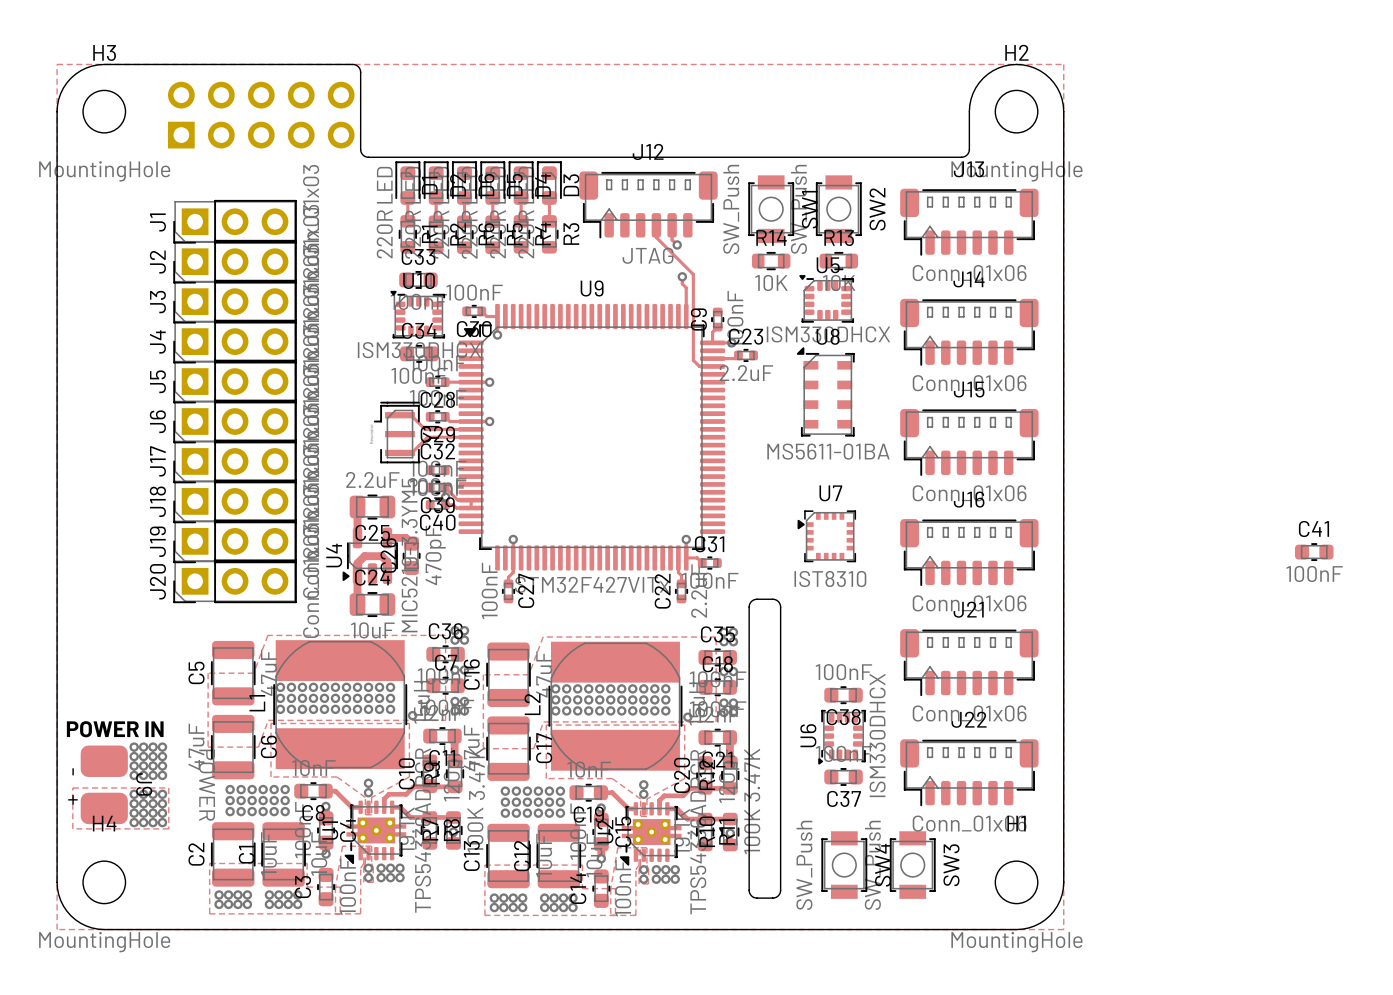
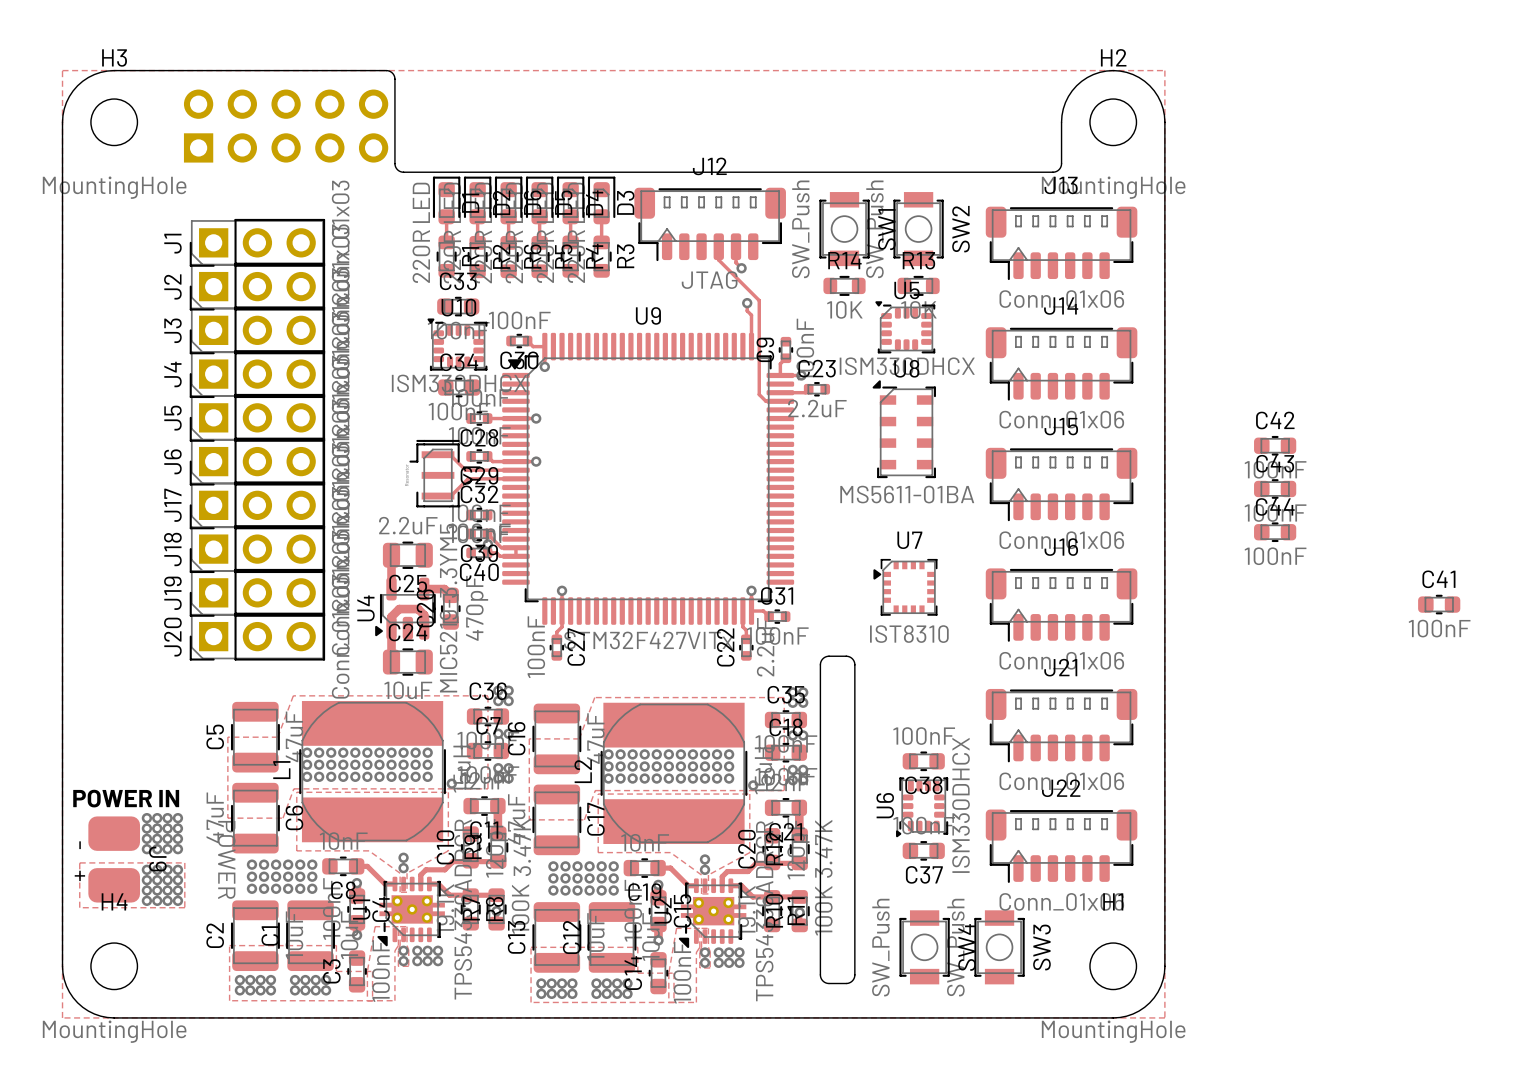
C42: none -> 100nF (1275, 445)
C43: none -> 100nF (1275, 488)
C44: none -> 100nF (1275, 532)

